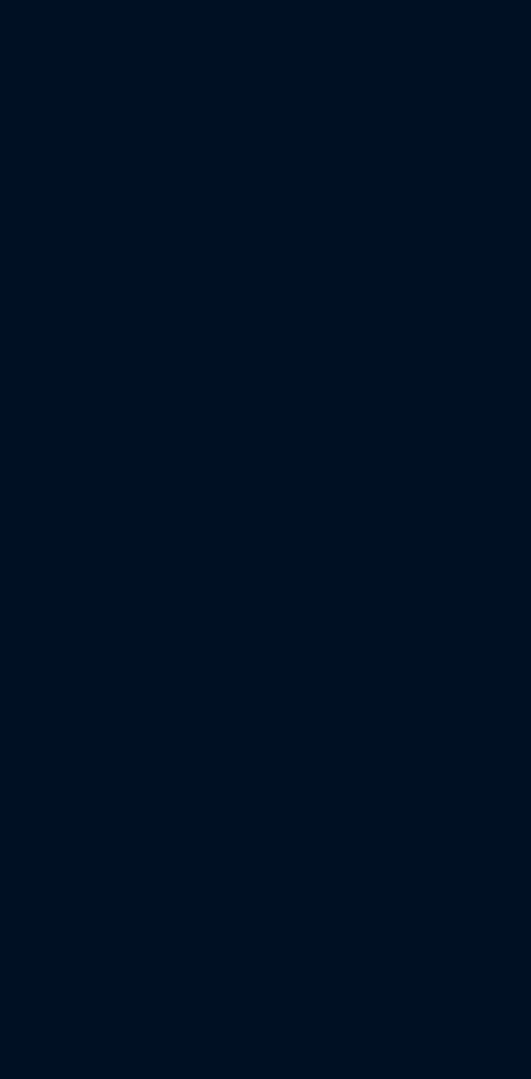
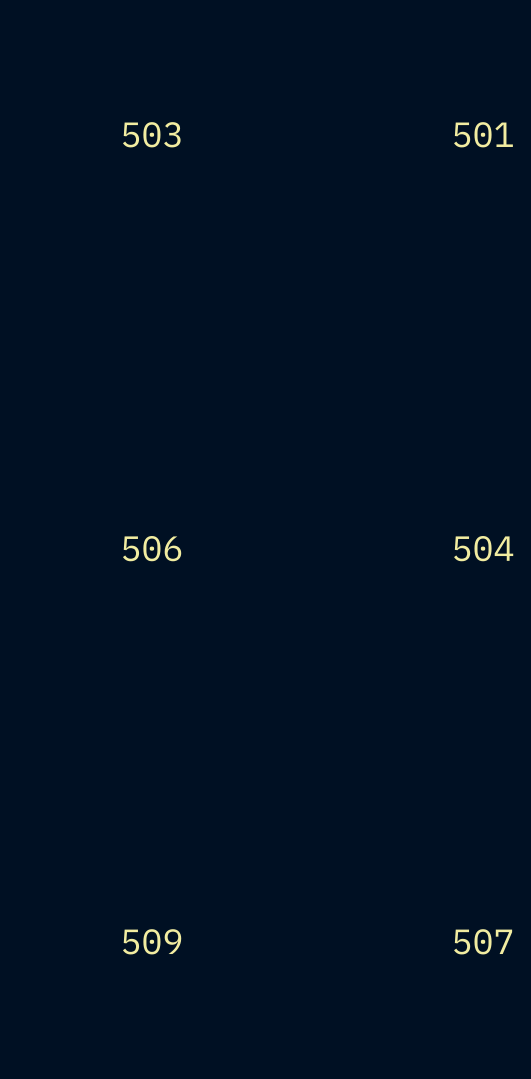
text: none -> 503 (151, 134)
text: none -> 501 (483, 134)
text: none -> 506 (152, 548)
text: none -> 504 (483, 548)
text: none -> 509 (152, 941)
text: none -> 507 (483, 941)

